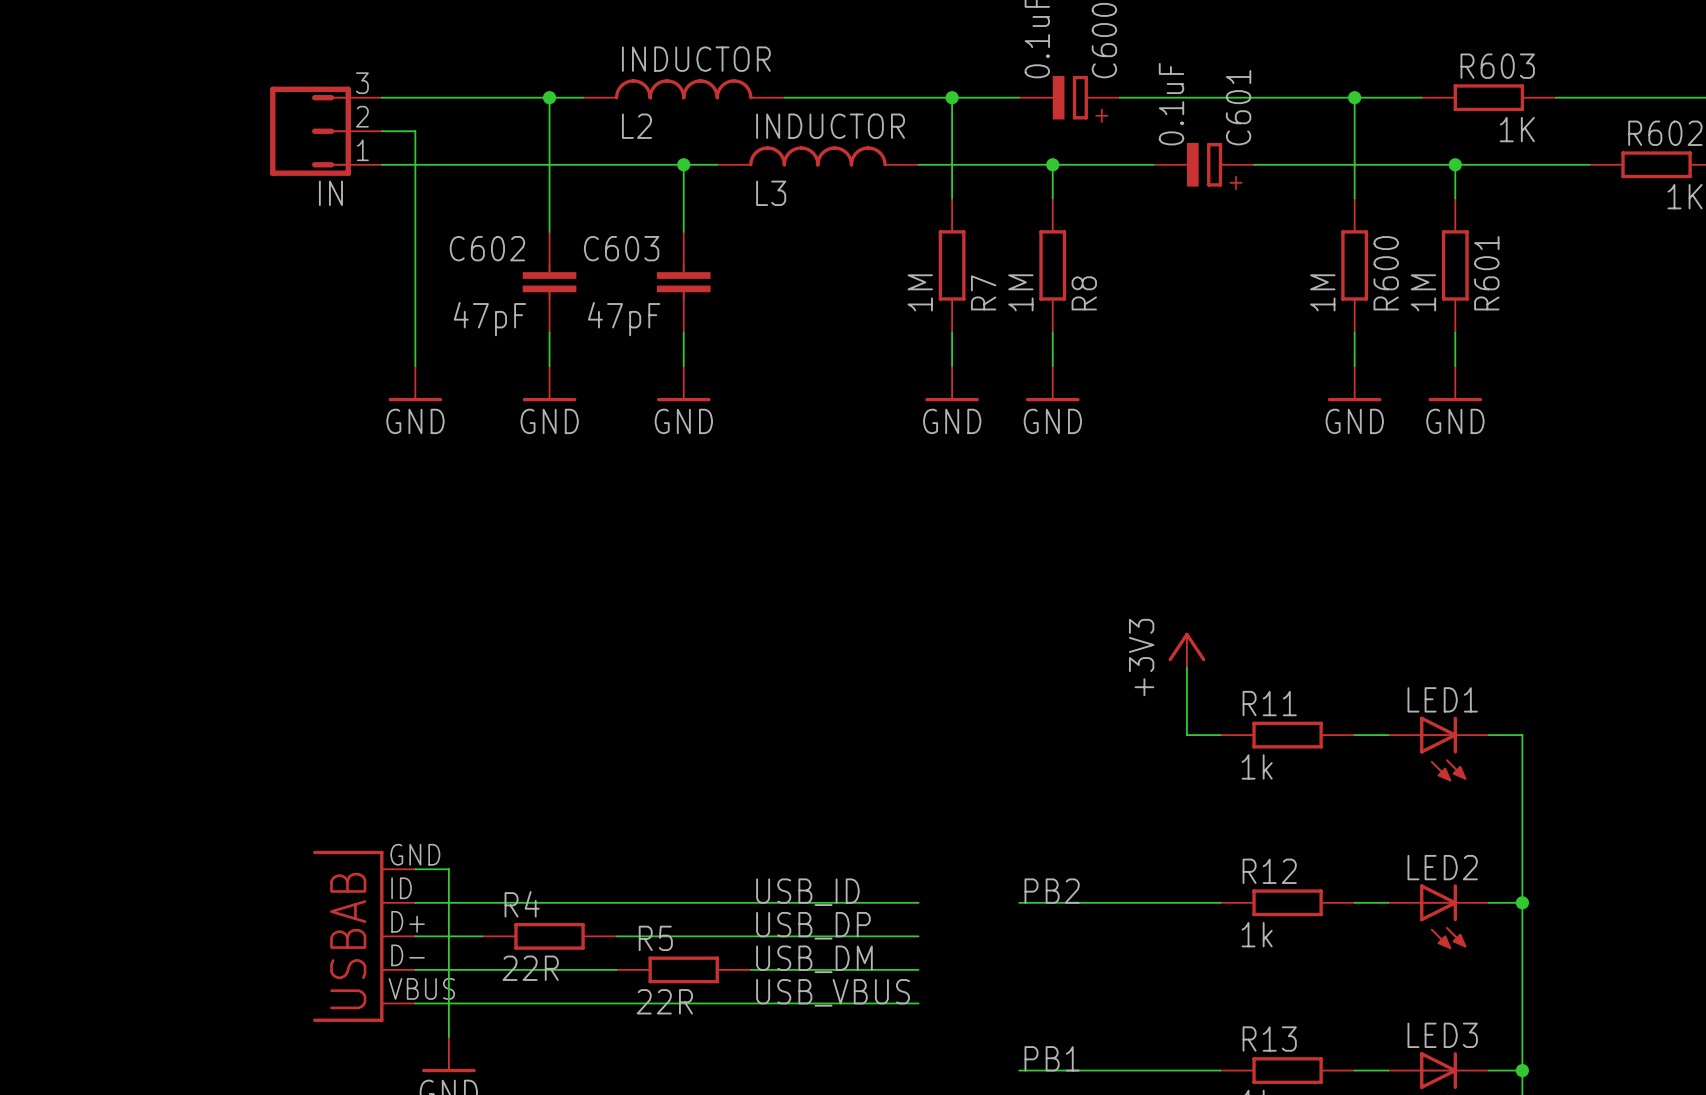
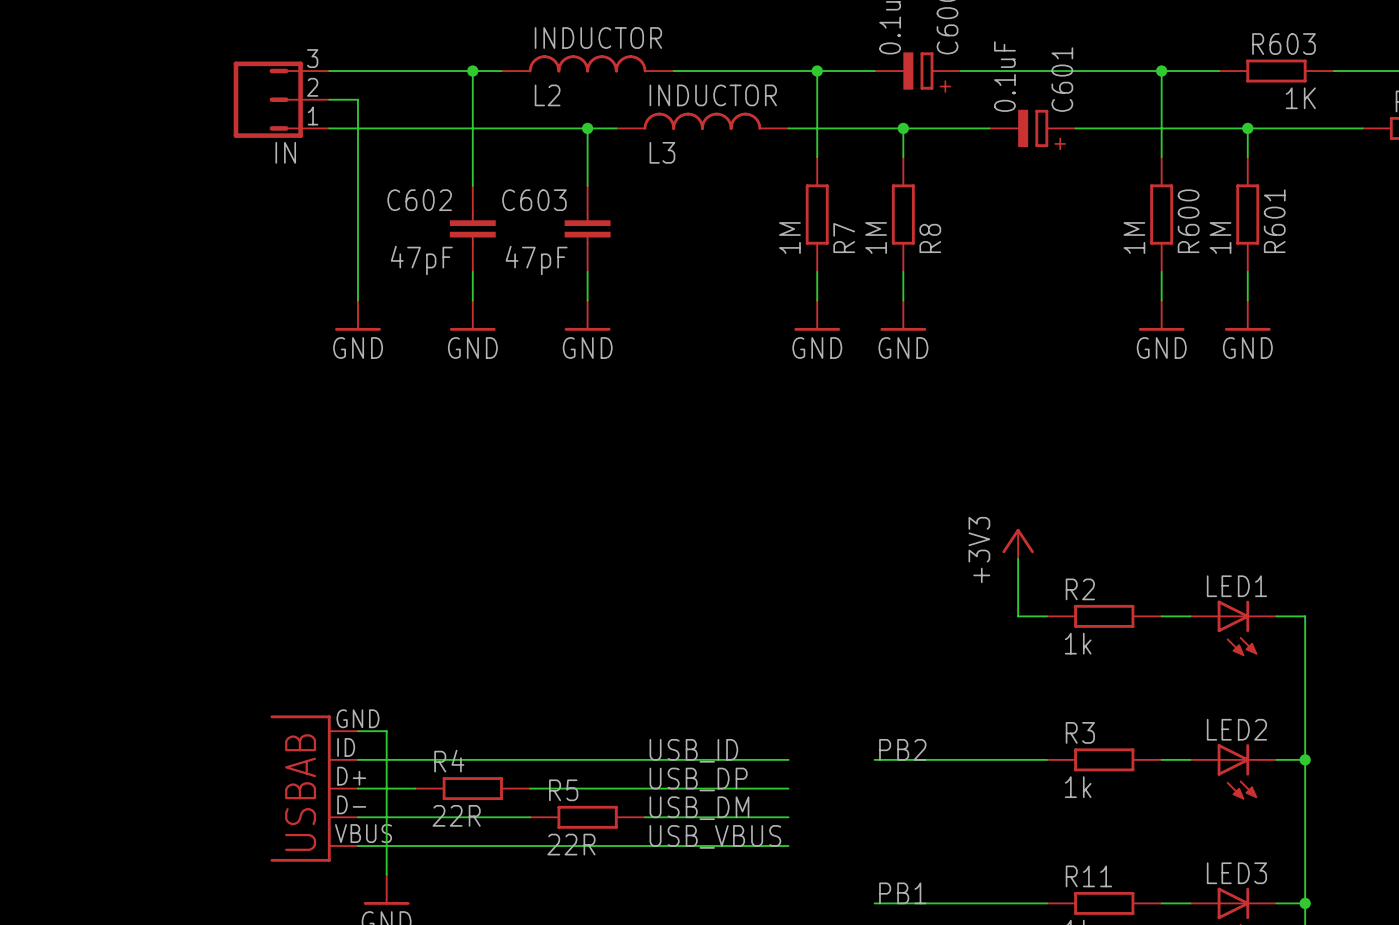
R11 name: R11 (1269, 703) -> R2 (1080, 589)
R12 name: R12 (1269, 871) -> R3 (1080, 732)
R13 name: R13 (1269, 1039) -> R11 (1088, 876)

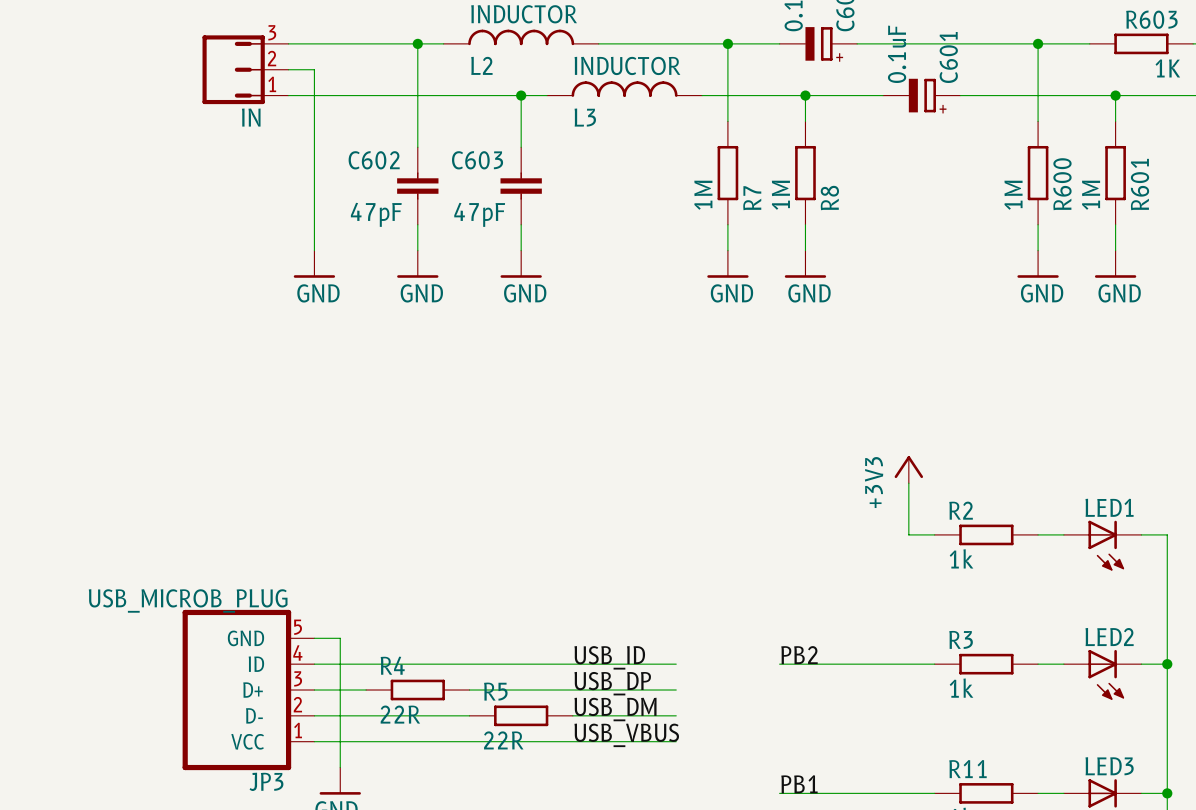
wire: (759, 759) (788, 759) -> none
JP3: none -> USB_MICROB_PLUG (248, 690)
part: (314, 788) -> none
wire: (759, 788) (788, 788) -> none
wire: (759, 817) (788, 817) -> none
wire: (759, 845) (788, 845) -> none

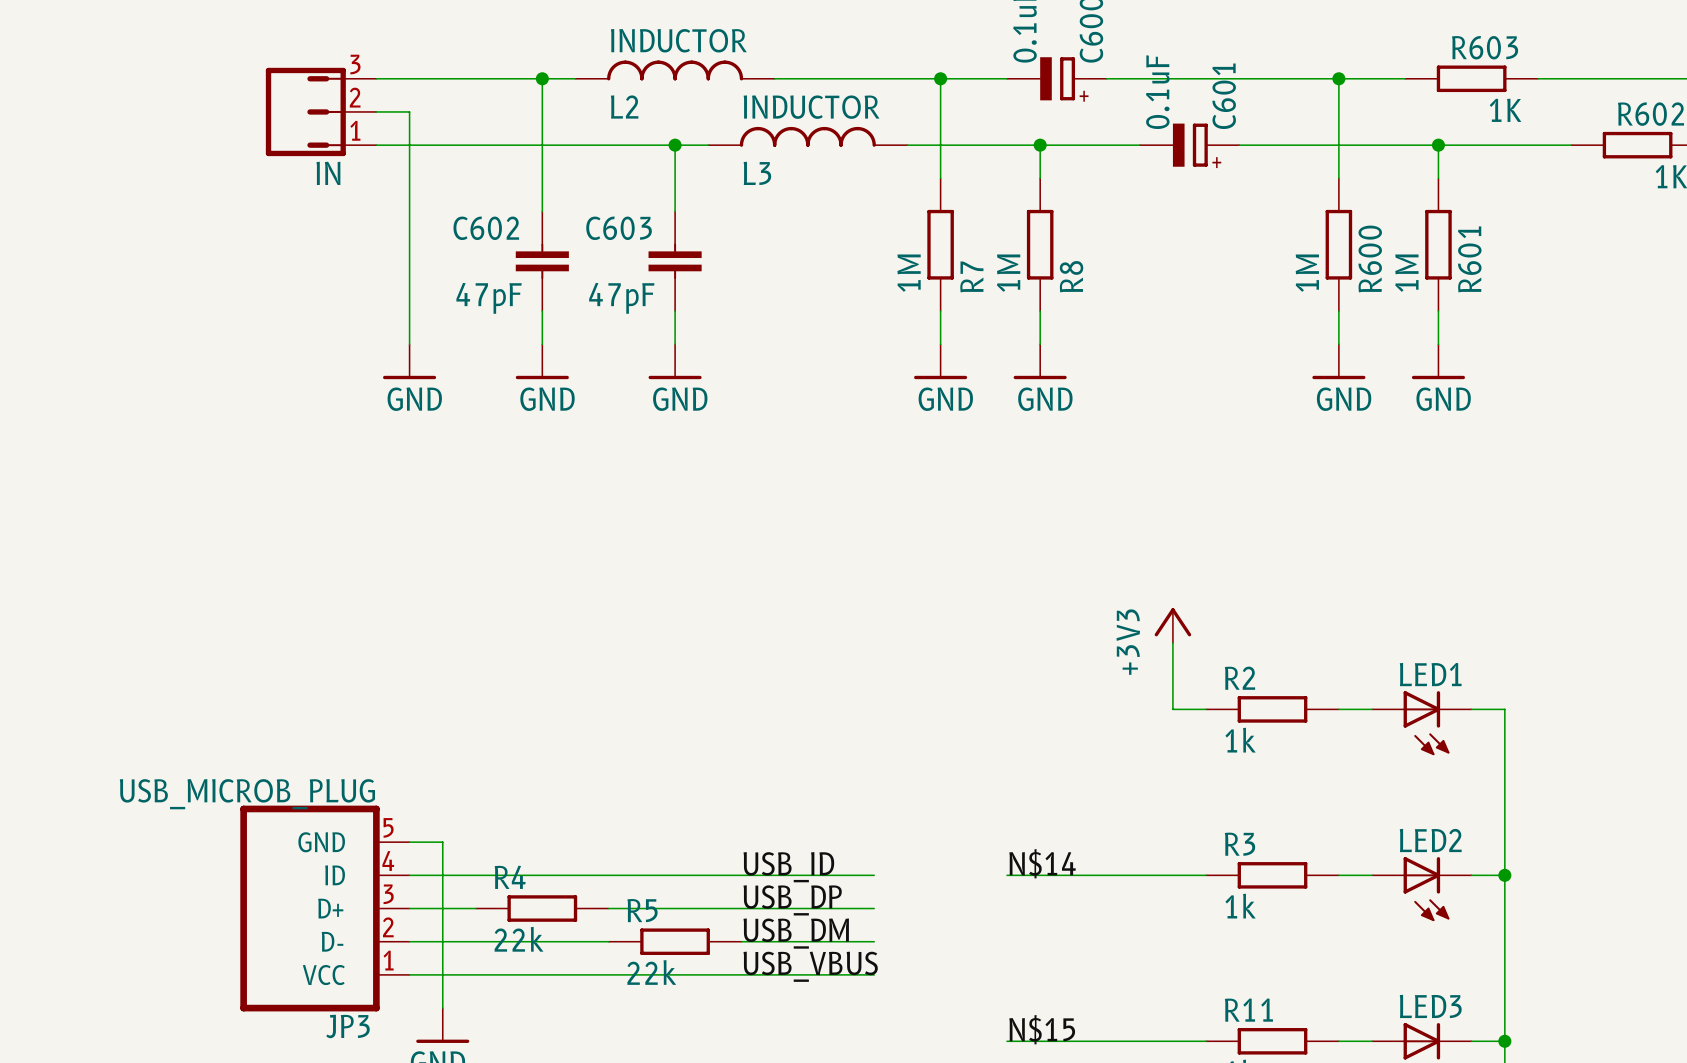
label: PB2 (799, 655) -> N$14 (1042, 863)
R4 value: 22R (400, 714) -> 22k (519, 939)
R5 value: 22R (503, 740) -> 22k (651, 972)
label: PB1 (799, 784) -> N$15 (1042, 1029)

